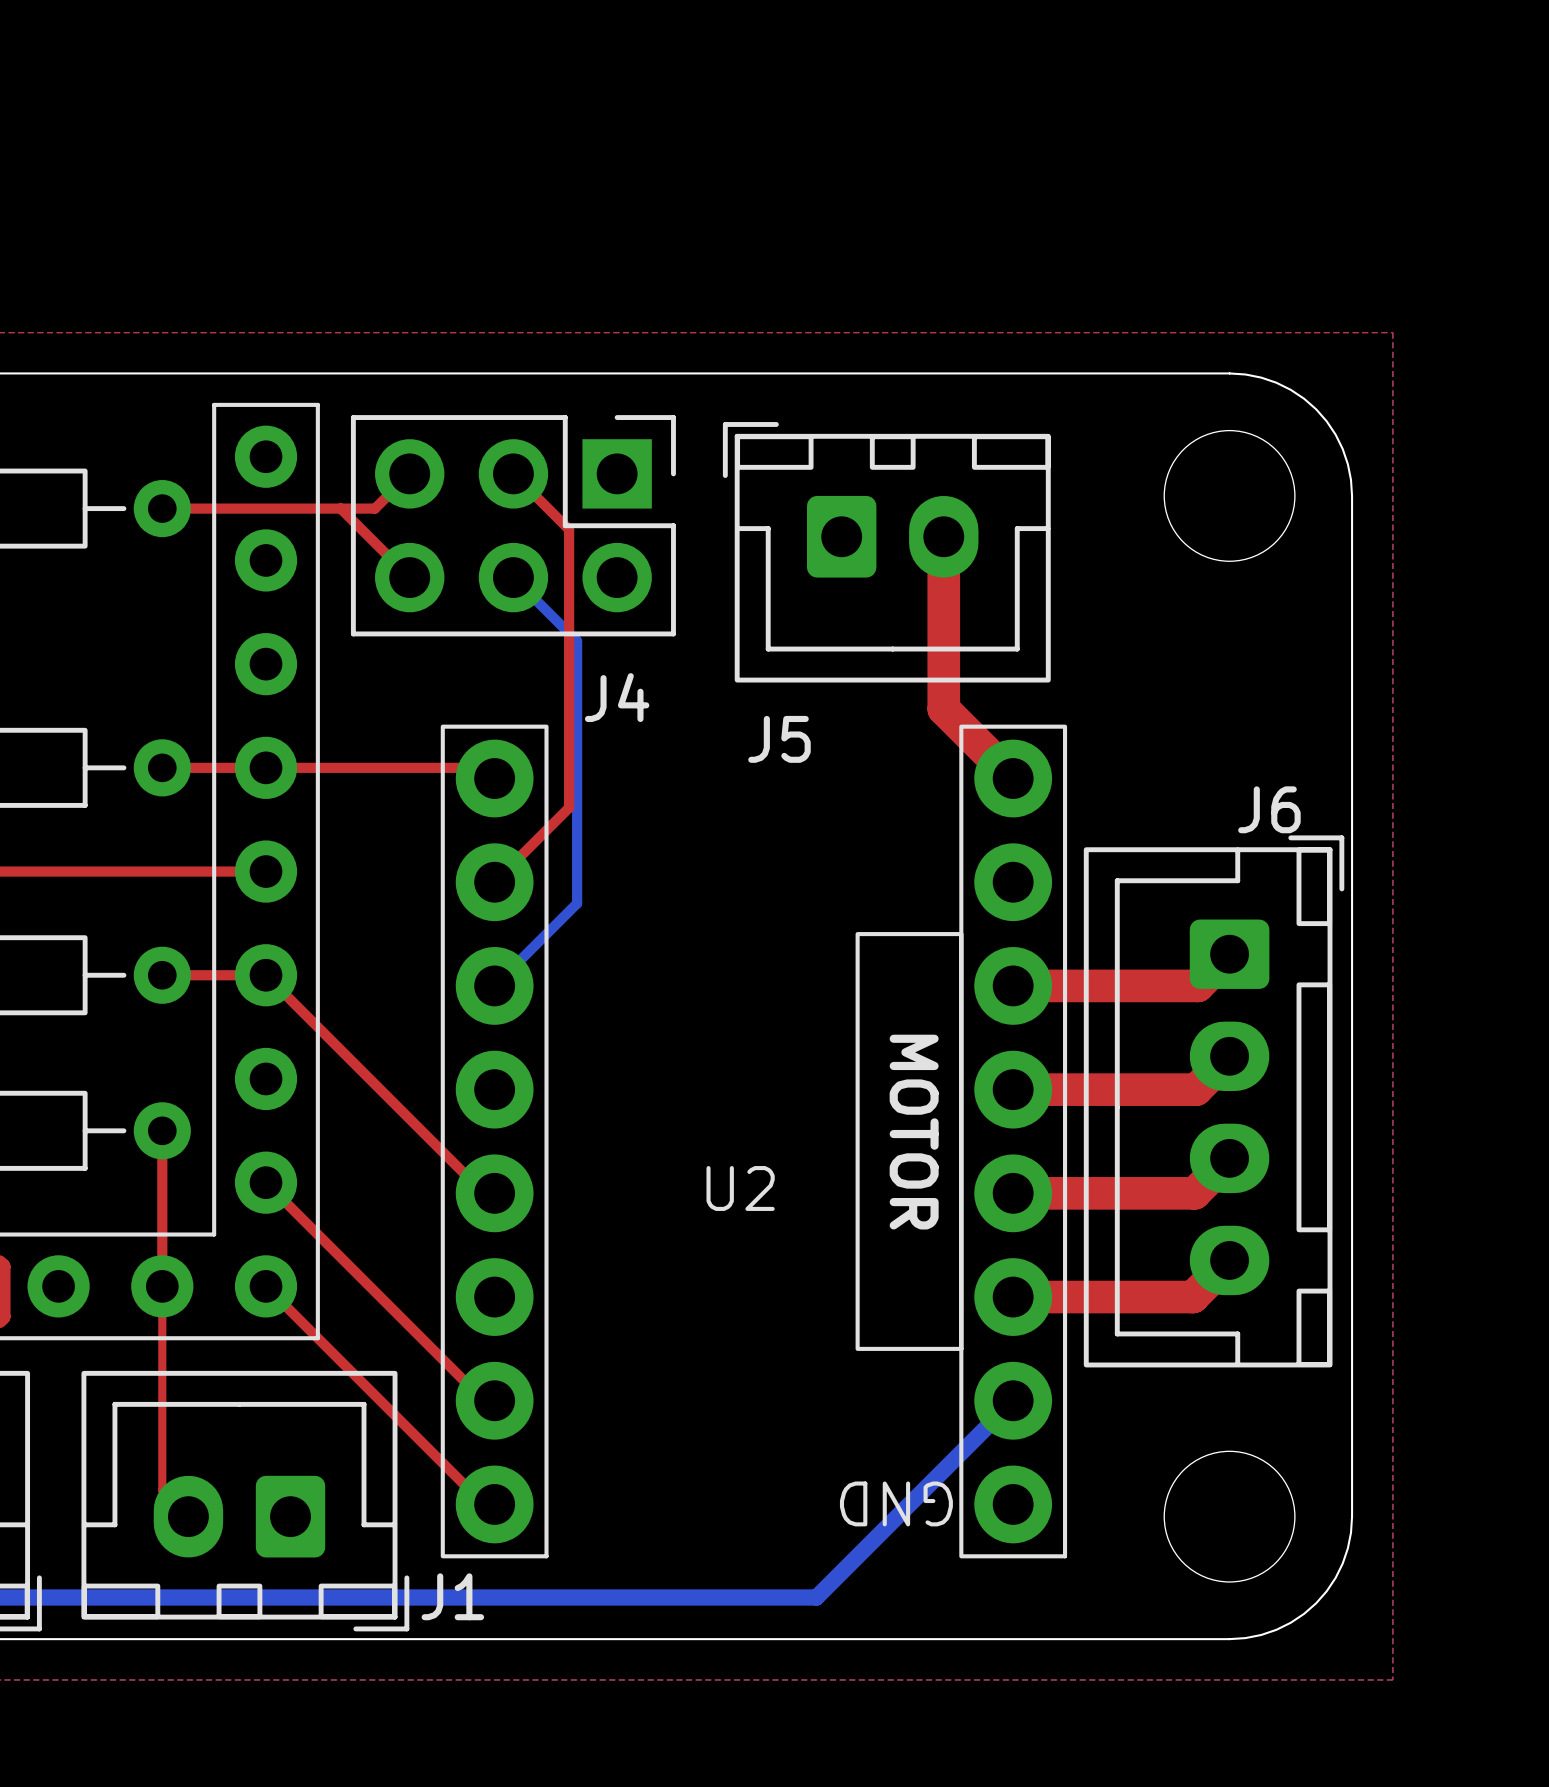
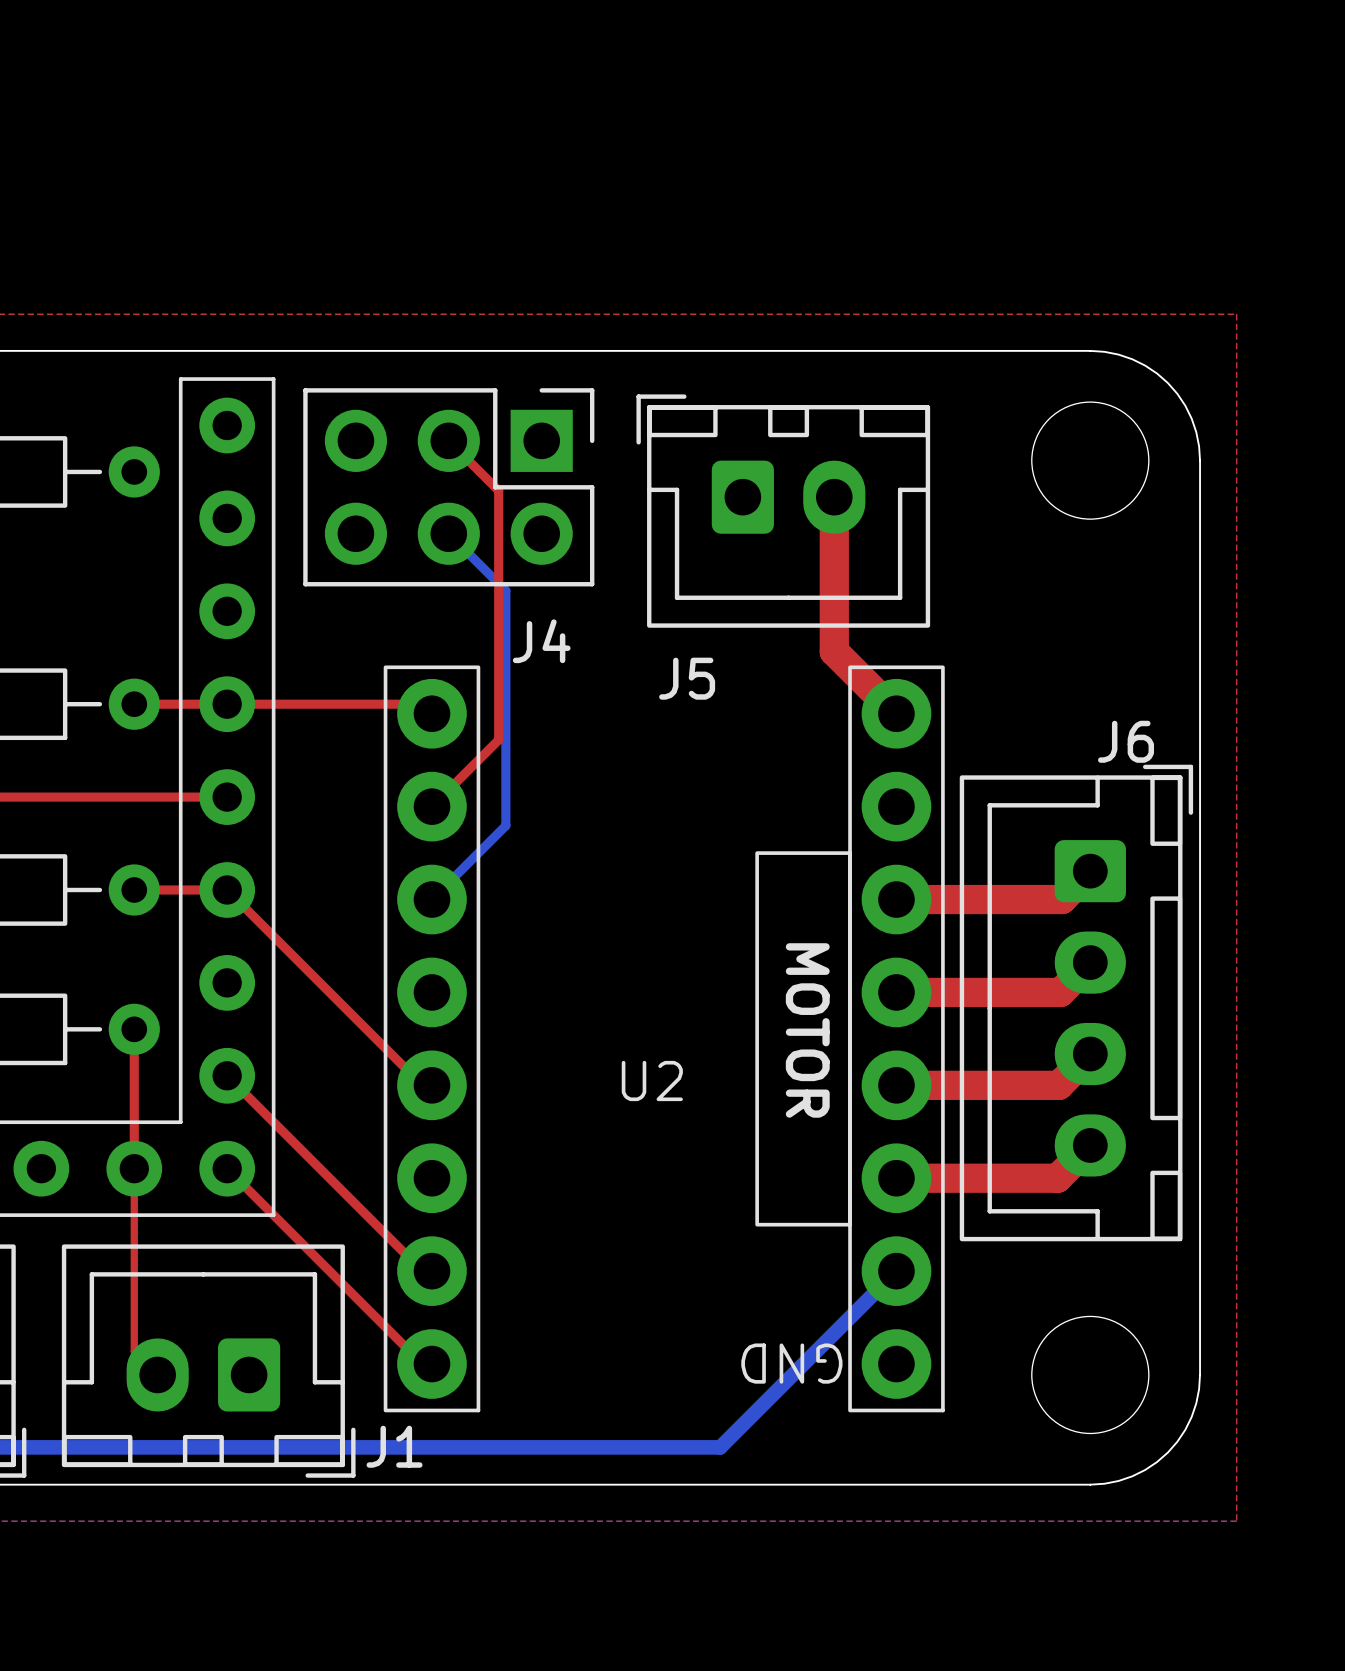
top track: (409, 473) (375, 508) (162, 508) -> none
top track: (340, 508) (409, 577) -> none

